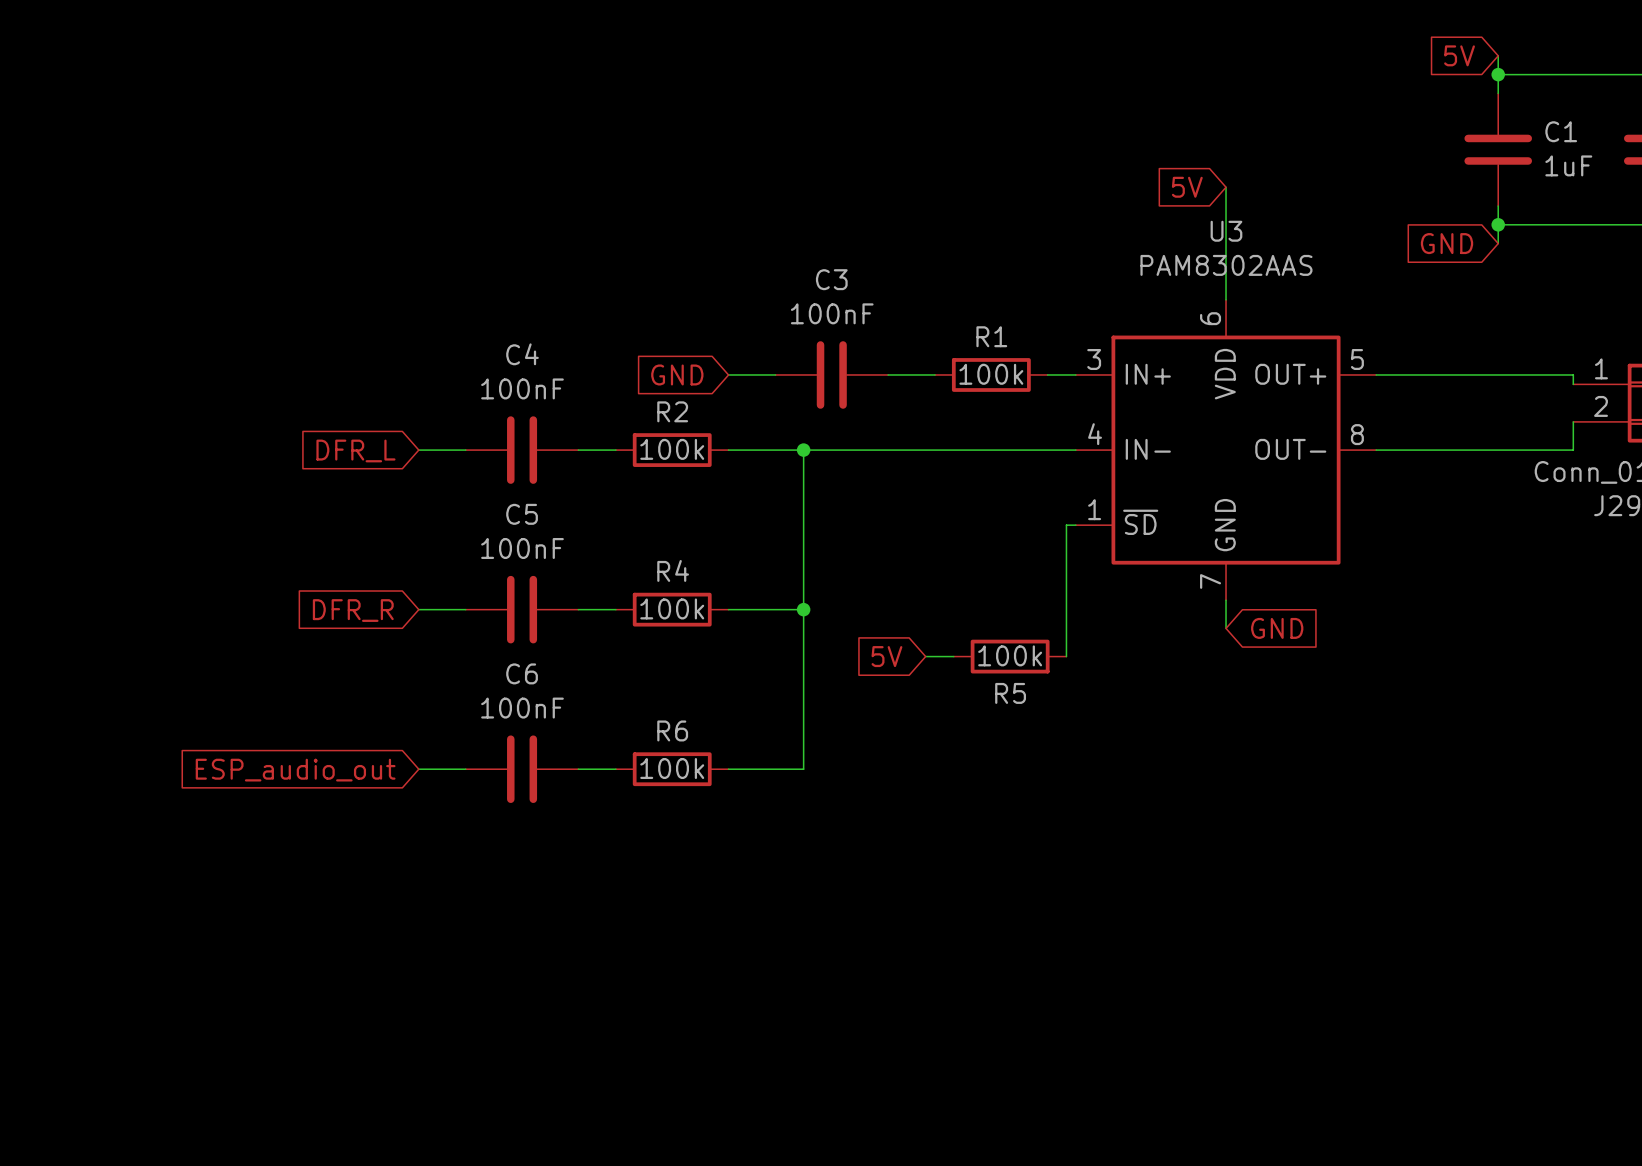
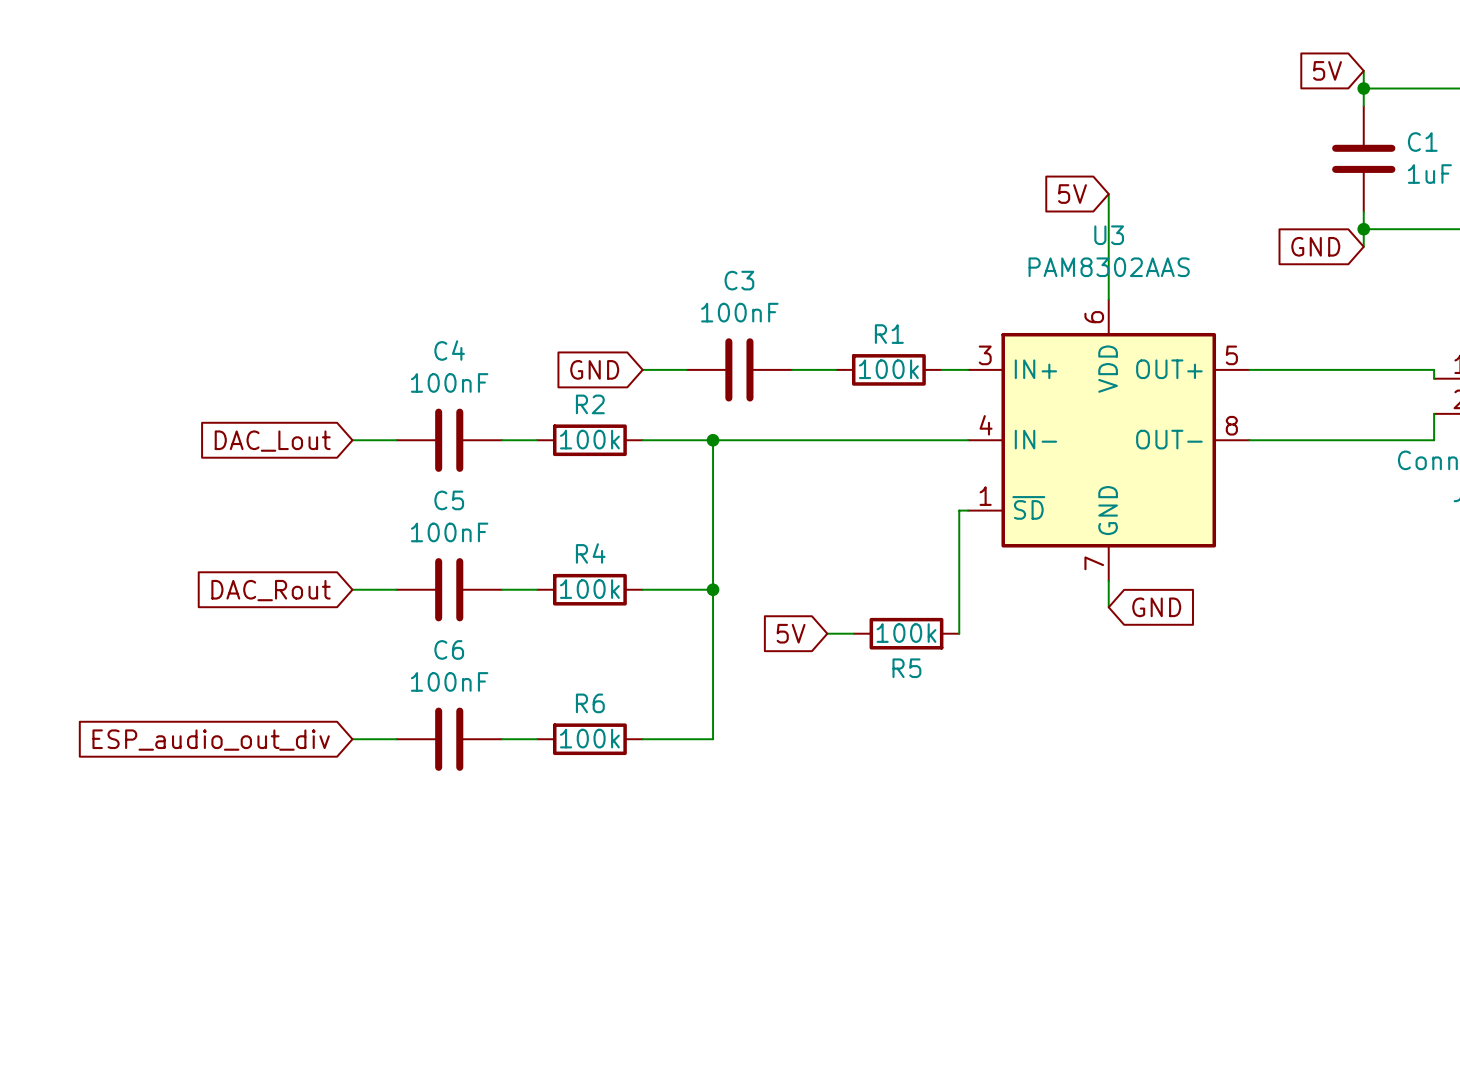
global label: DFR_L (355, 450) -> DAC_Lout (272, 441)
global label: DFR_R (353, 610) -> DAC_Rout (271, 590)
global label: ESP_audio_out (295, 770) -> ESP_audio_out_div (211, 740)

